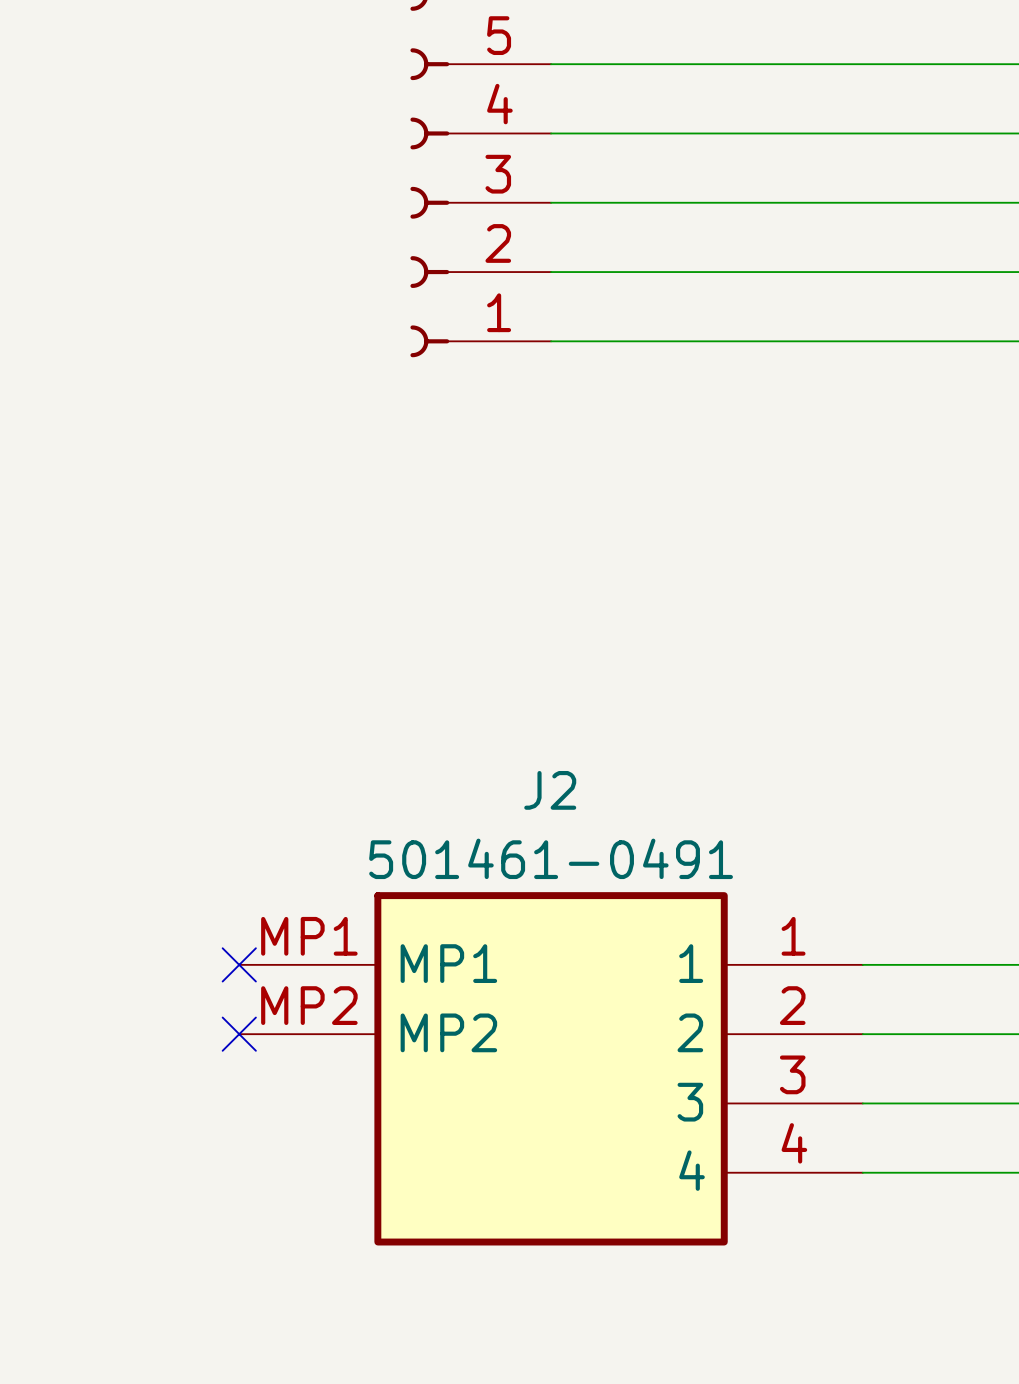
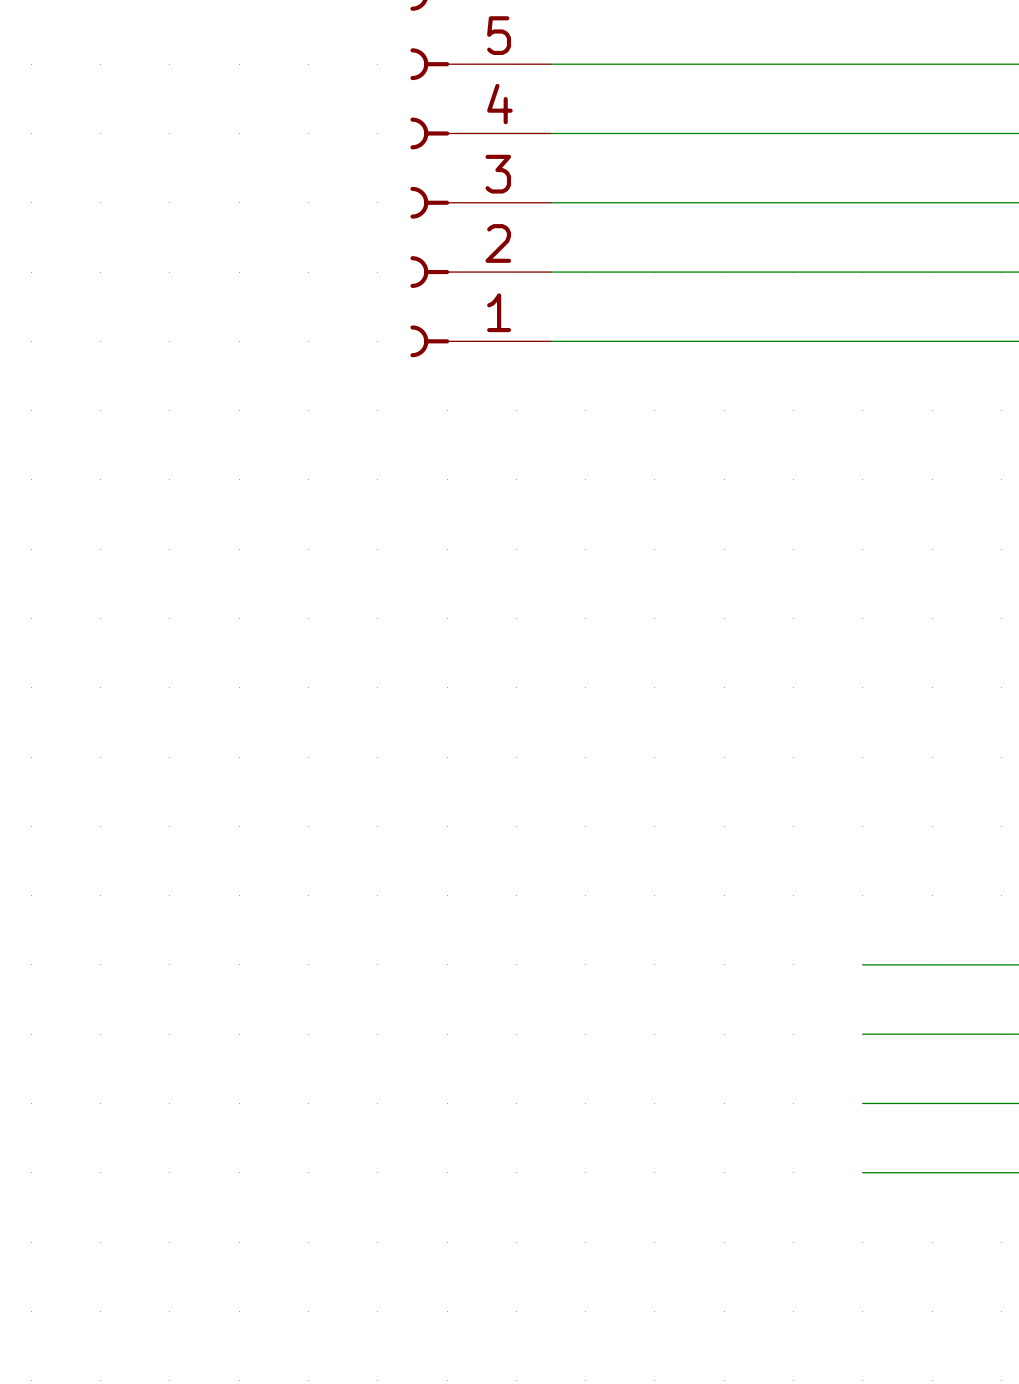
no-connect mark: (239, 964) -> none
no-connect mark: (239, 1034) -> none
J2: 501461-0491 (551, 1068) -> none

